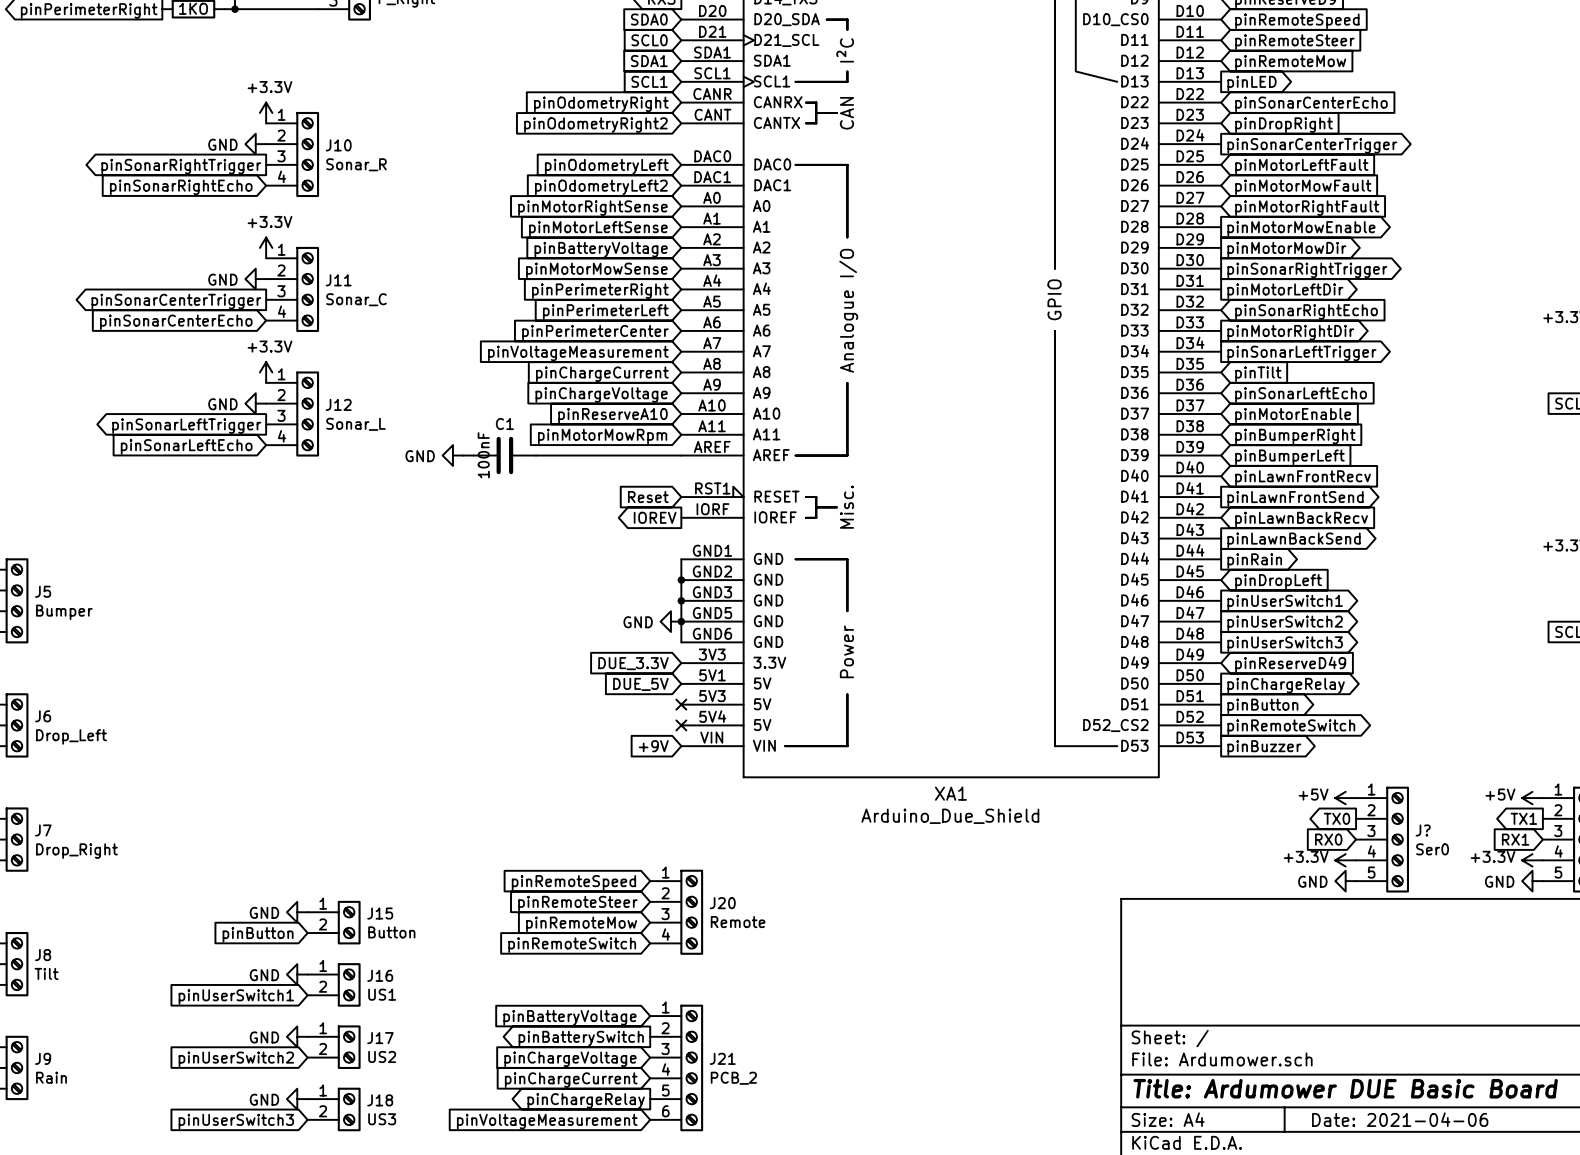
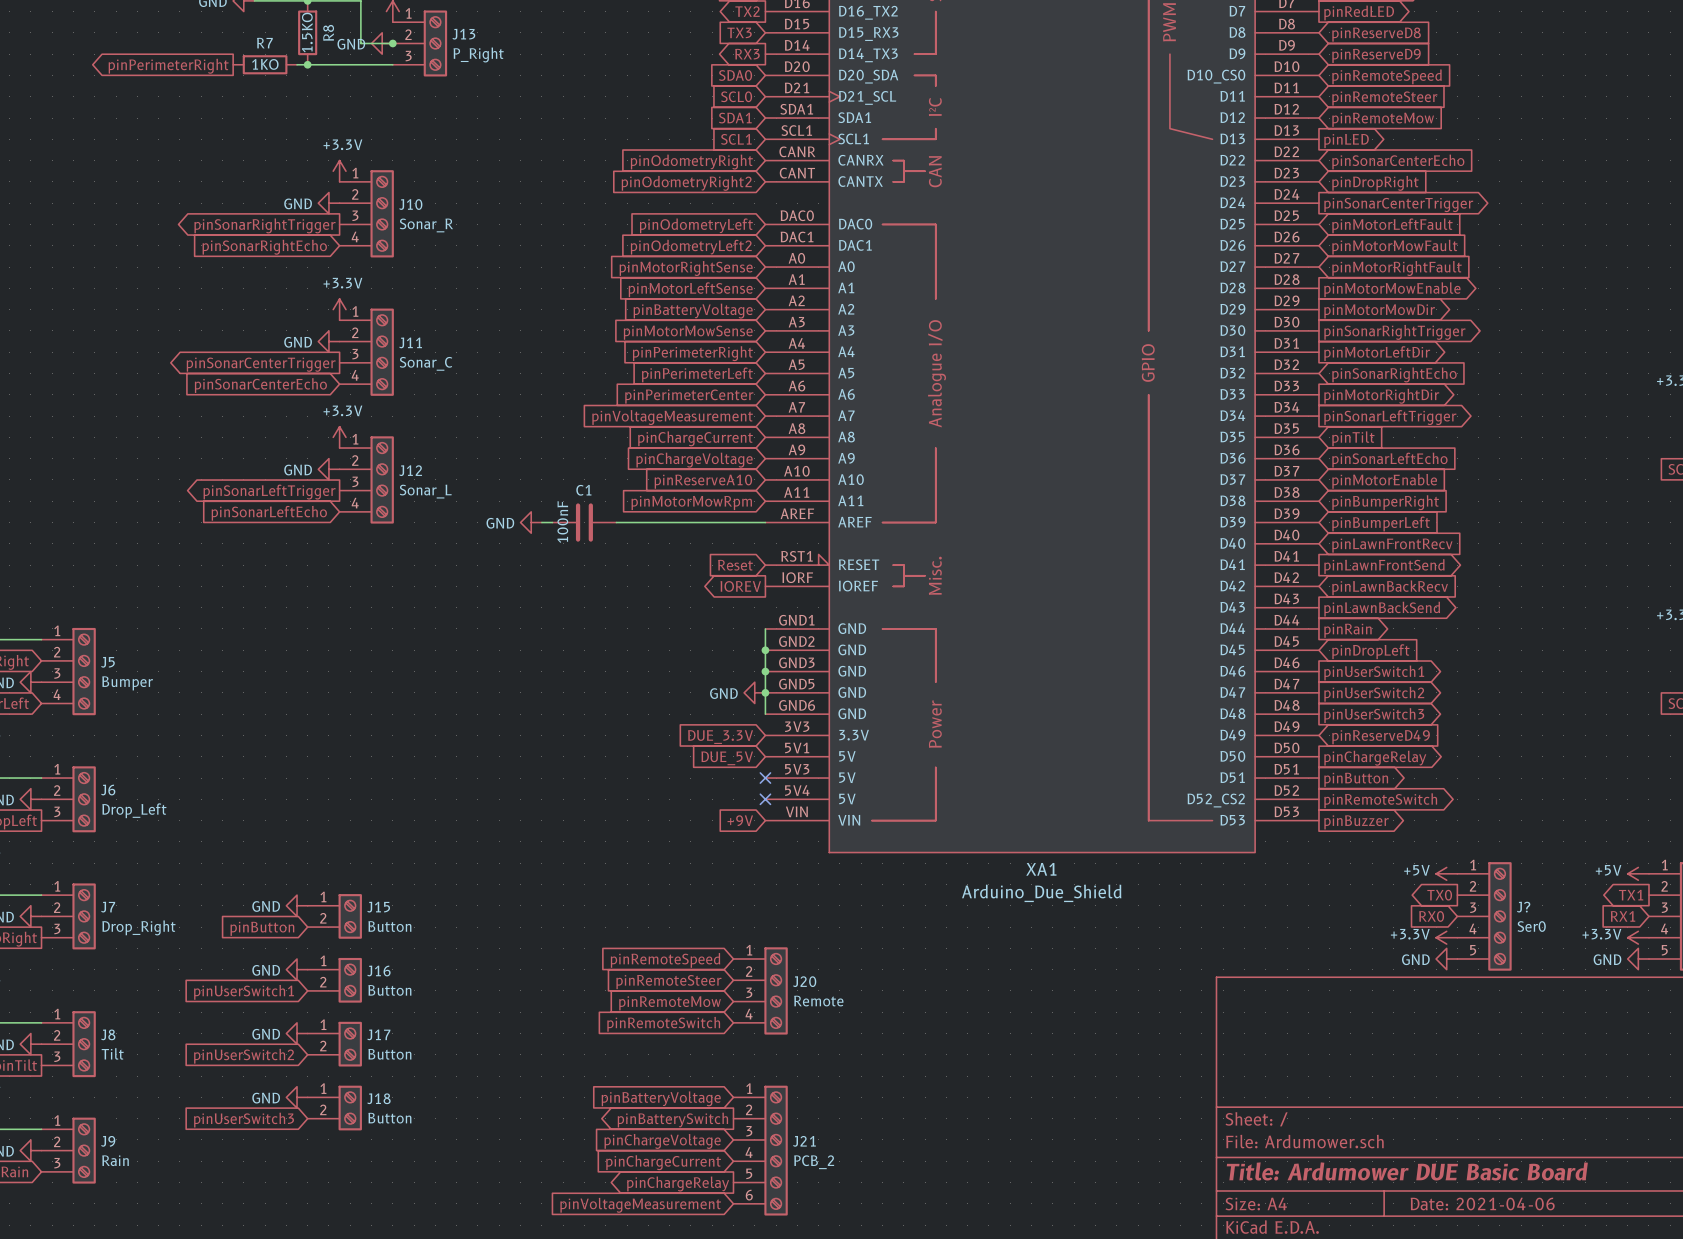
power symbol: none -> GND (297, 905)
power symbol: none -> GND (297, 969)
power symbol: GND (297, 912) -> none
J15 position: (334, 922) -> (334, 916)
global label position: pinButton (258, 934) -> pinButton (262, 928)
power symbol: none -> GND (297, 1033)
power symbol: GND (297, 974) -> none
J16 position: (334, 984) -> (334, 980)
J16 value: US1 (382, 994) -> Button (389, 990)
global label position: pinUserSwitch1 (236, 997) -> pinUserSwitch1 (244, 992)
power symbol: none -> GND (297, 1097)
power symbol: GND (297, 1036) -> none
J17 position: (334, 1047) -> (334, 1044)
J17 value: US2 (382, 1056) -> Button (389, 1054)
global label position: pinUserSwitch2 (236, 1059) -> pinUserSwitch2 (244, 1056)
power symbol: GND (297, 1099) -> none
J18 position: (334, 1109) -> (334, 1108)
J18 value: US3 (382, 1119) -> Button (389, 1118)
global label position: pinUserSwitch3 (236, 1121) -> pinUserSwitch3 (244, 1120)

